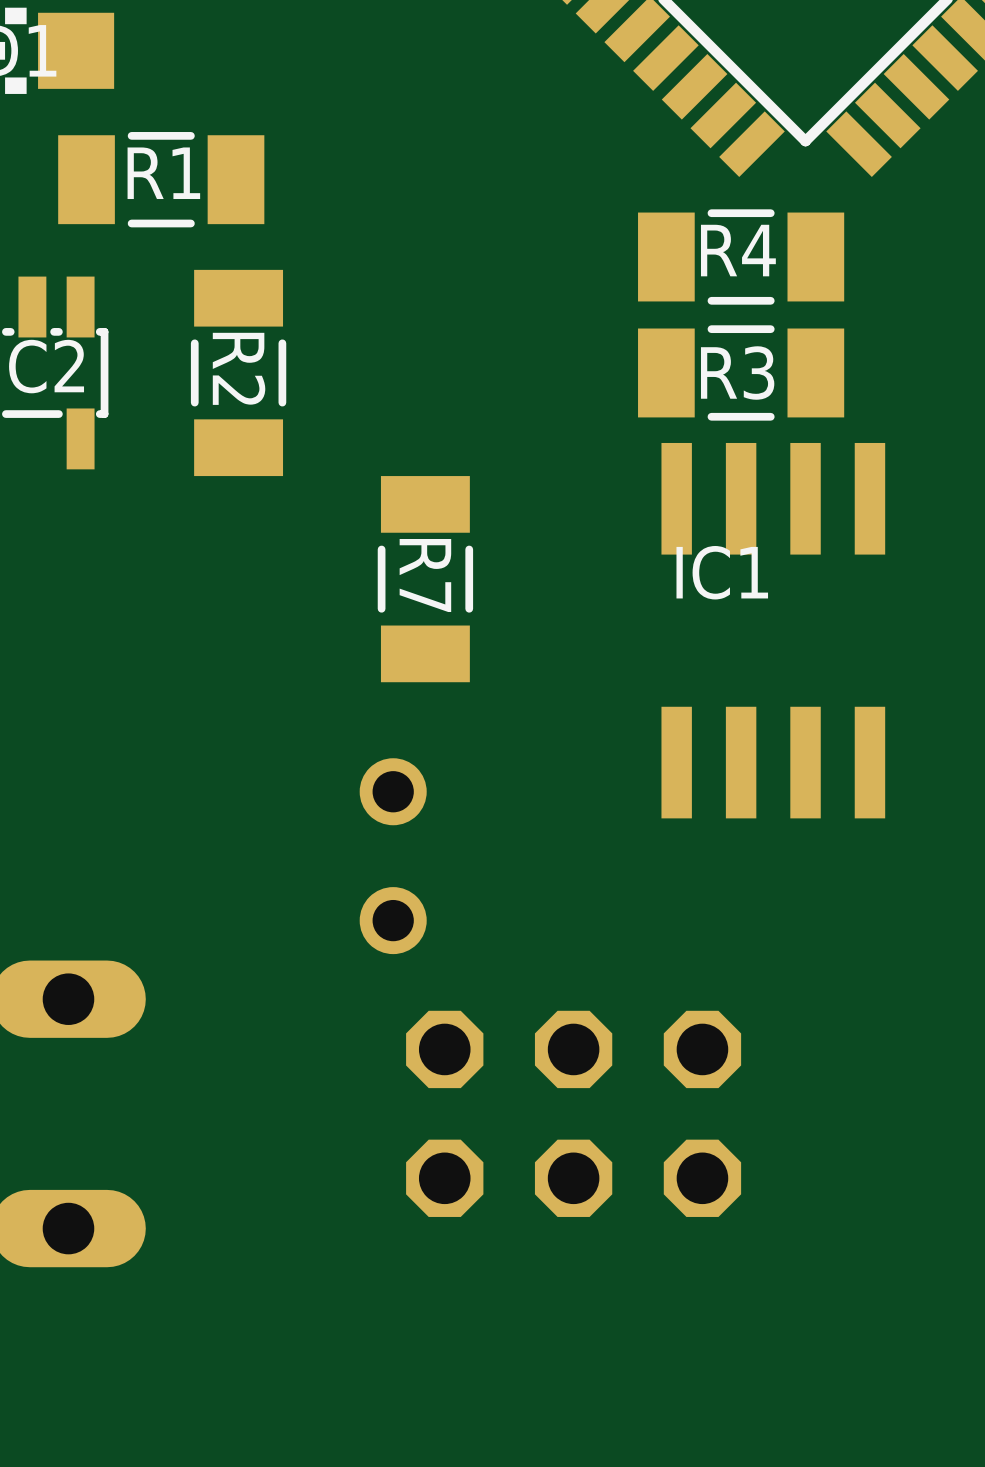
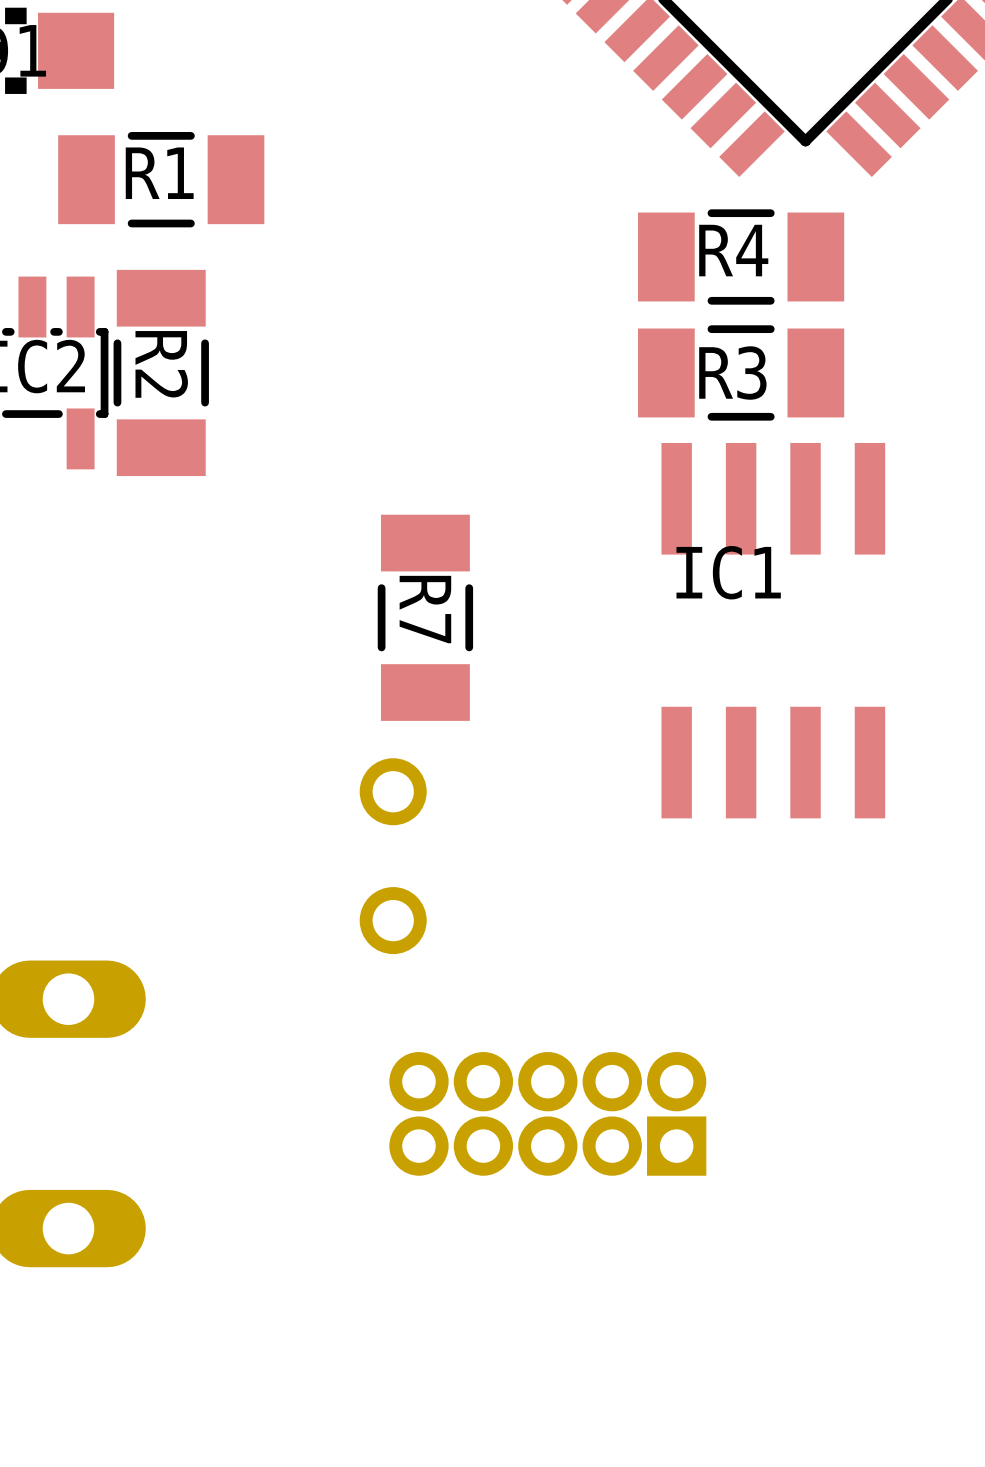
R2 position: (238, 372) -> (161, 372)
R7 position: (425, 579) -> (425, 617)
part footprint: [406, 1010, 742, 1217] -> [389, 1052, 707, 1176]

